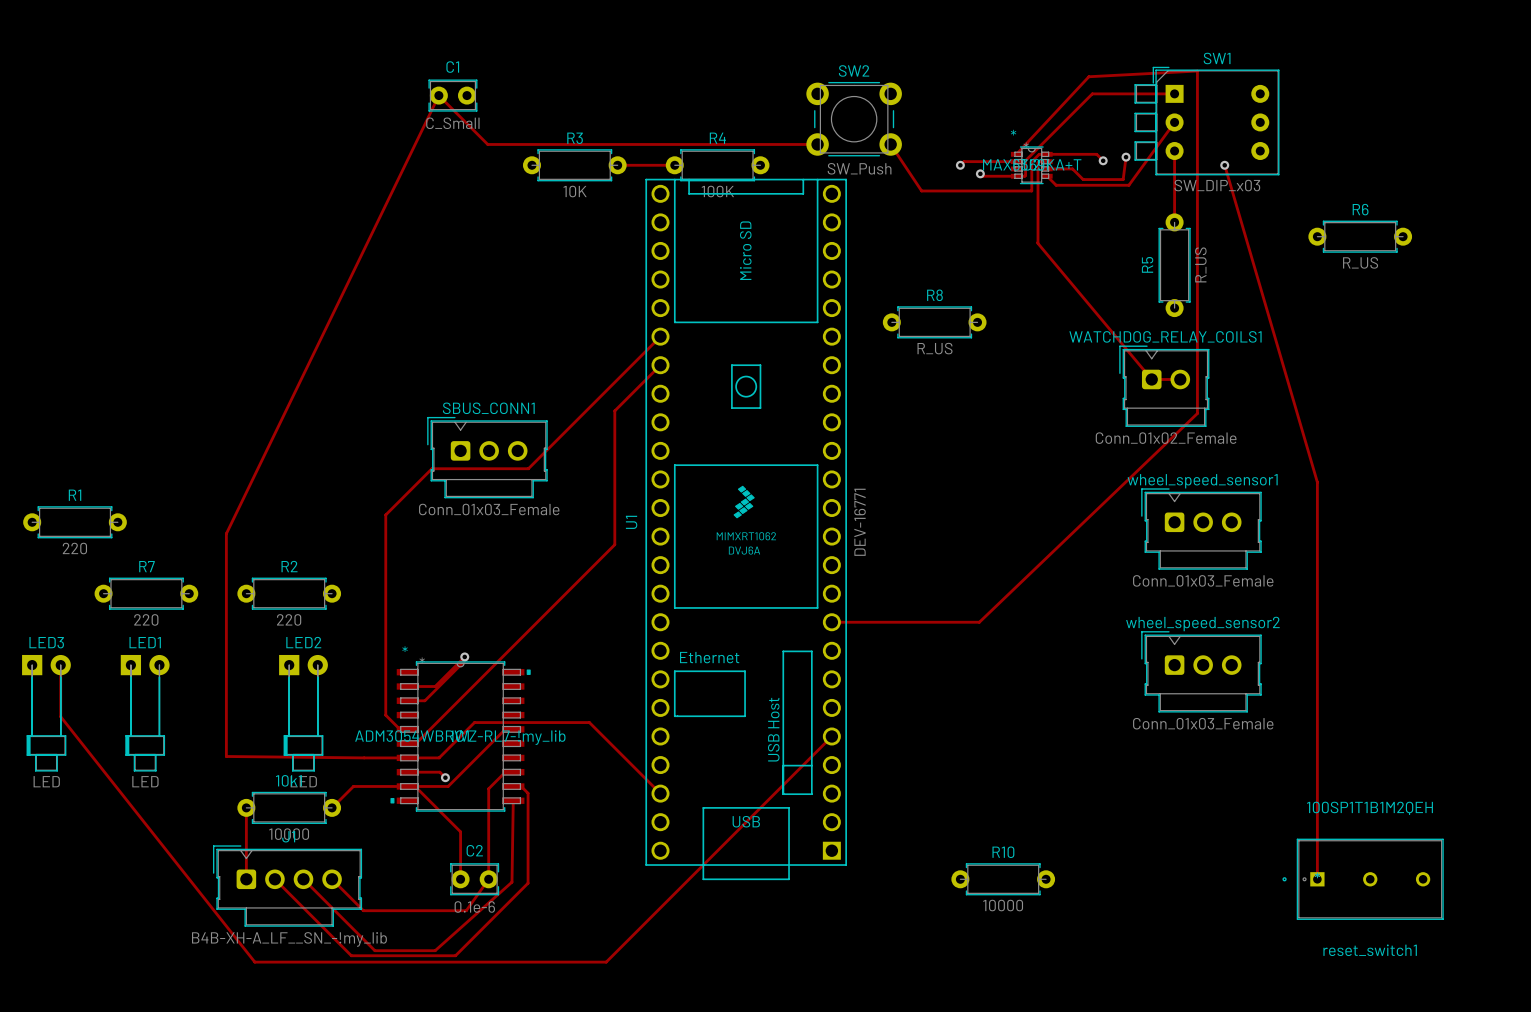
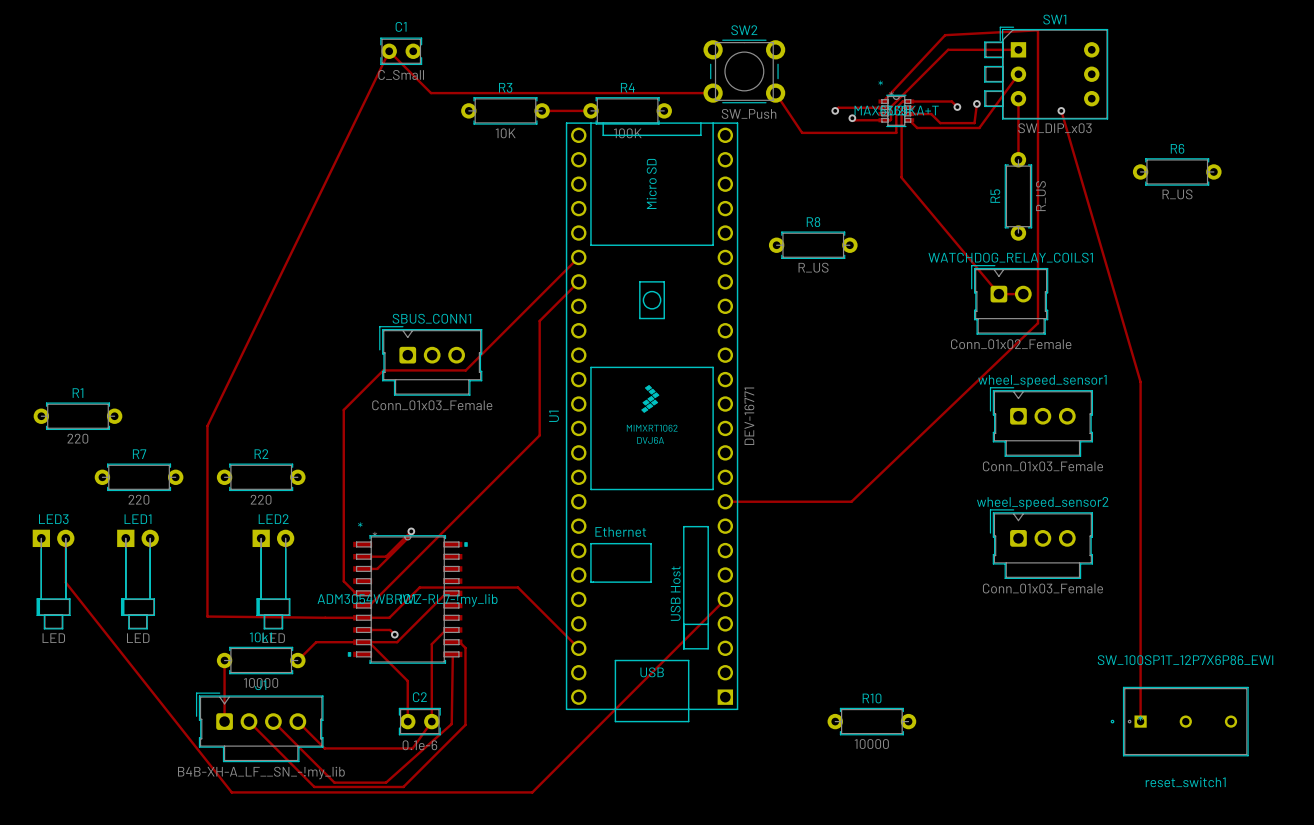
reset_switch1 value: 100SP1T1B1M2QEH (1369, 808) -> SW_100SP1T_12P7X6P86_EWI (1185, 660)

